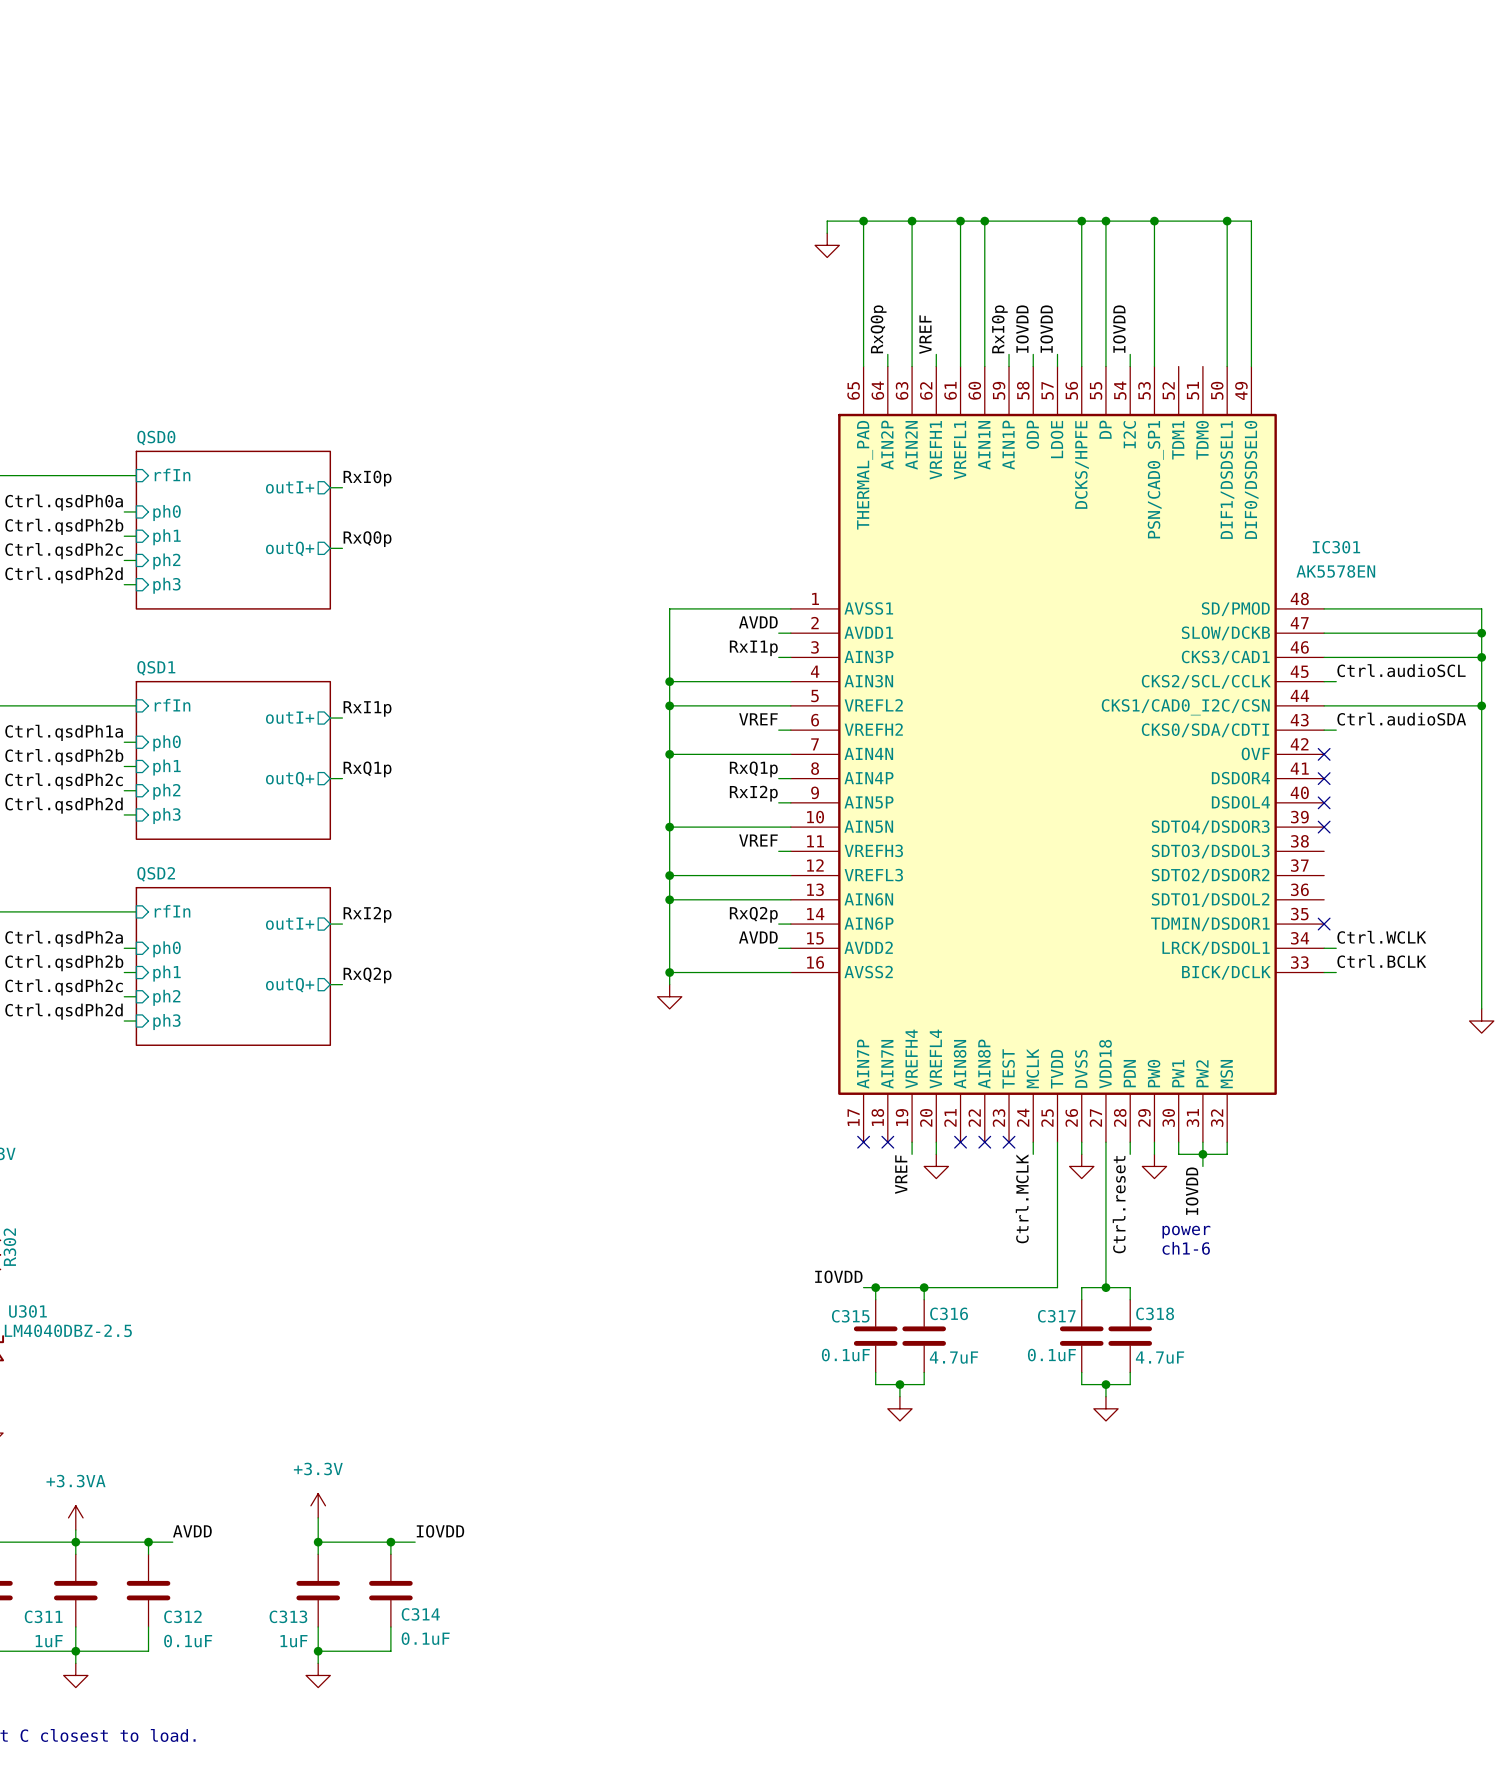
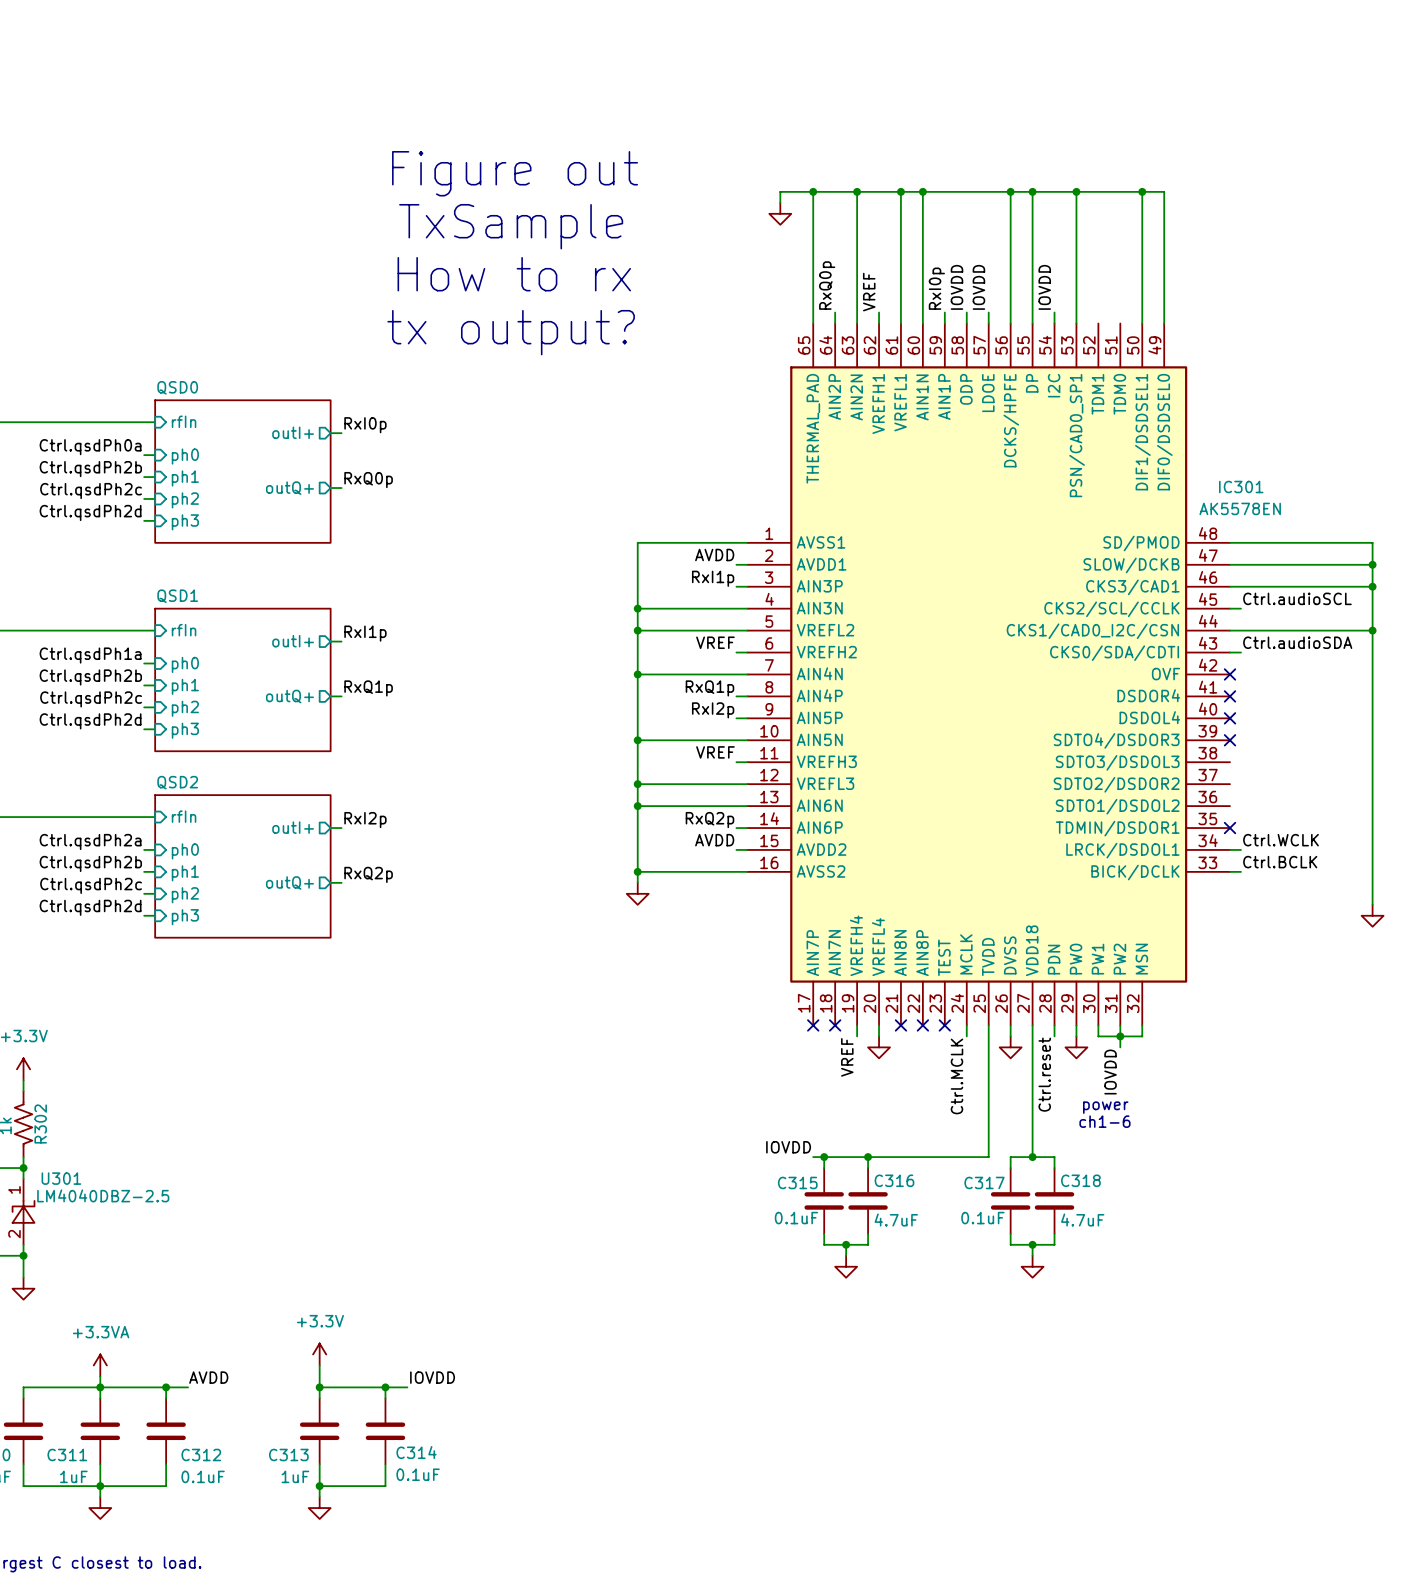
text: none -> Figure out (515, 173)
text: none -> TxSample (511, 226)
text: none -> How to rx (514, 274)
text: none -> tx output? (511, 332)

